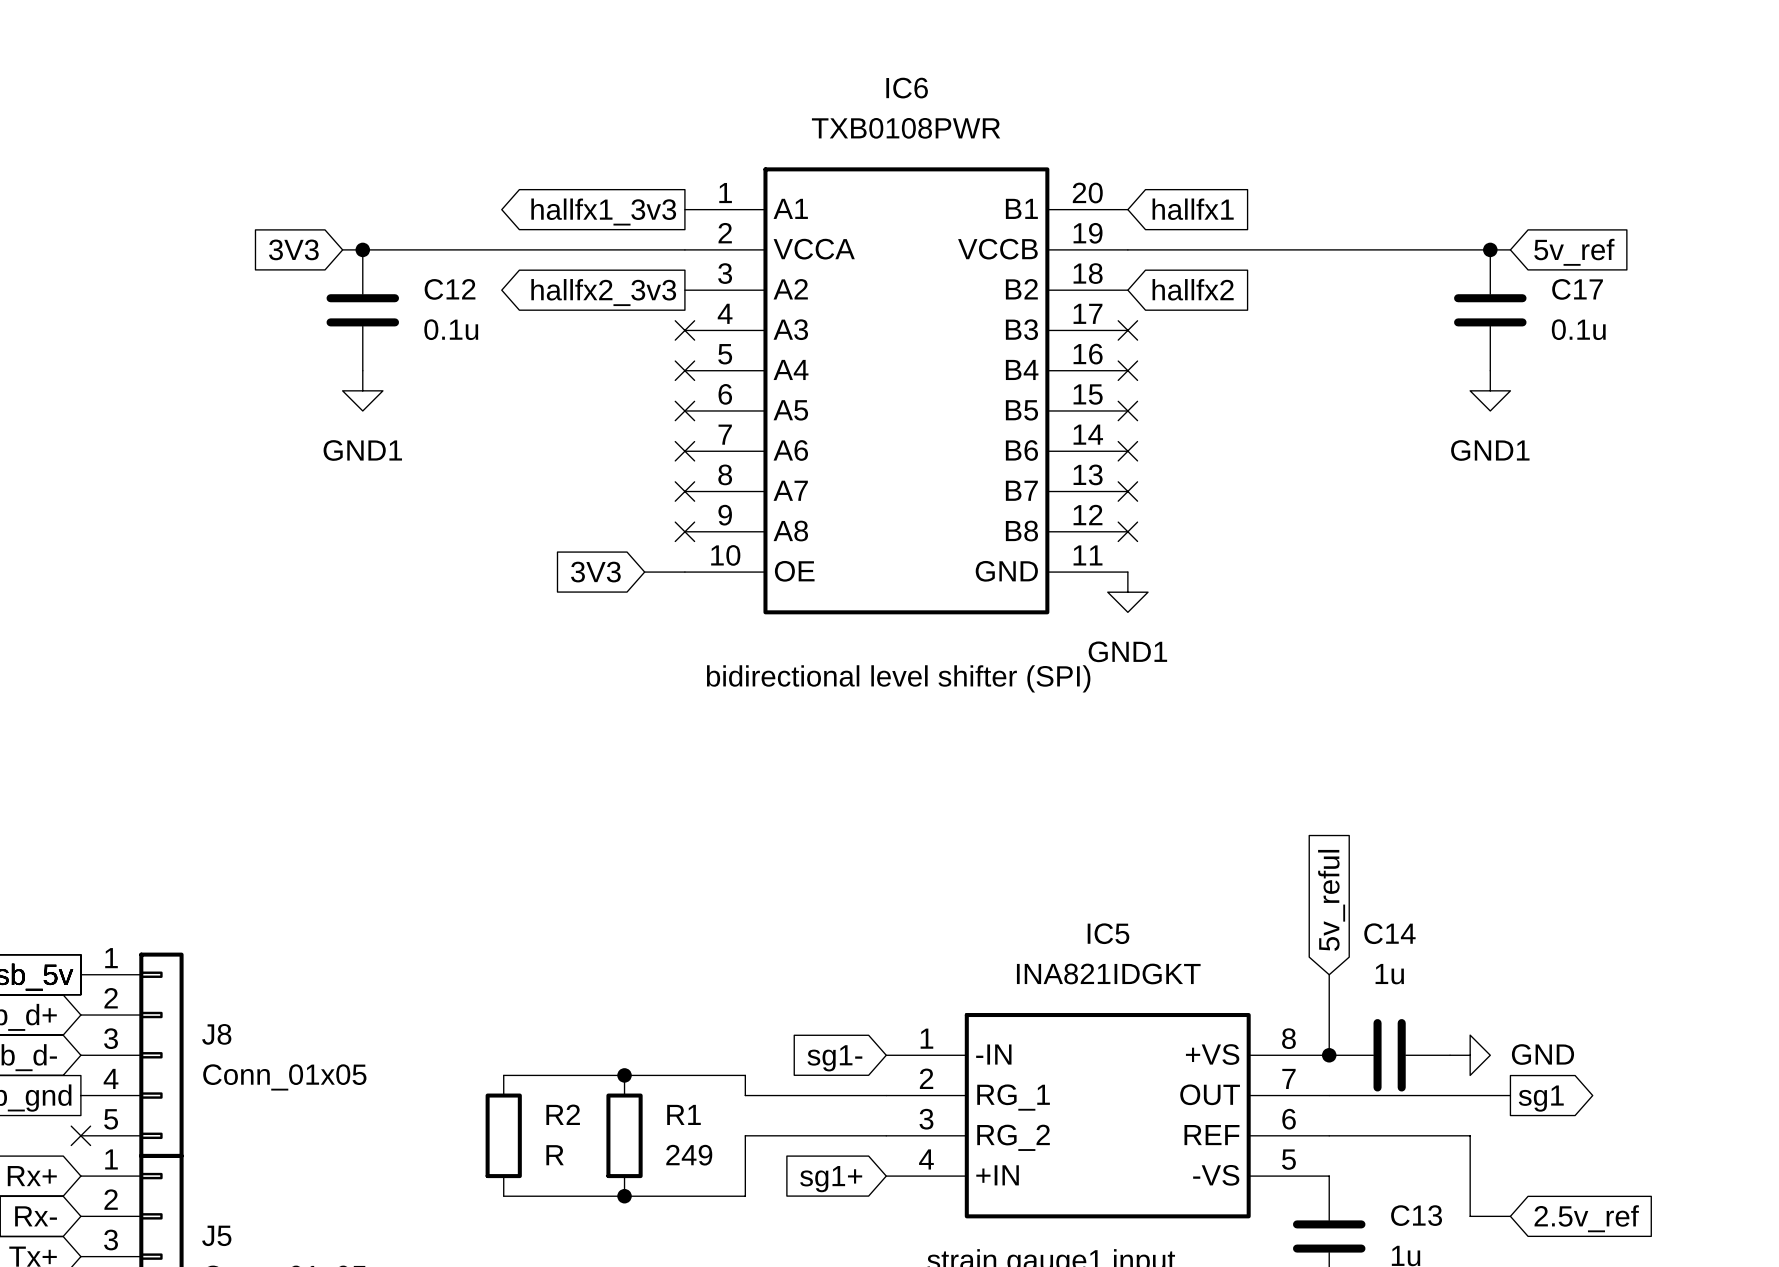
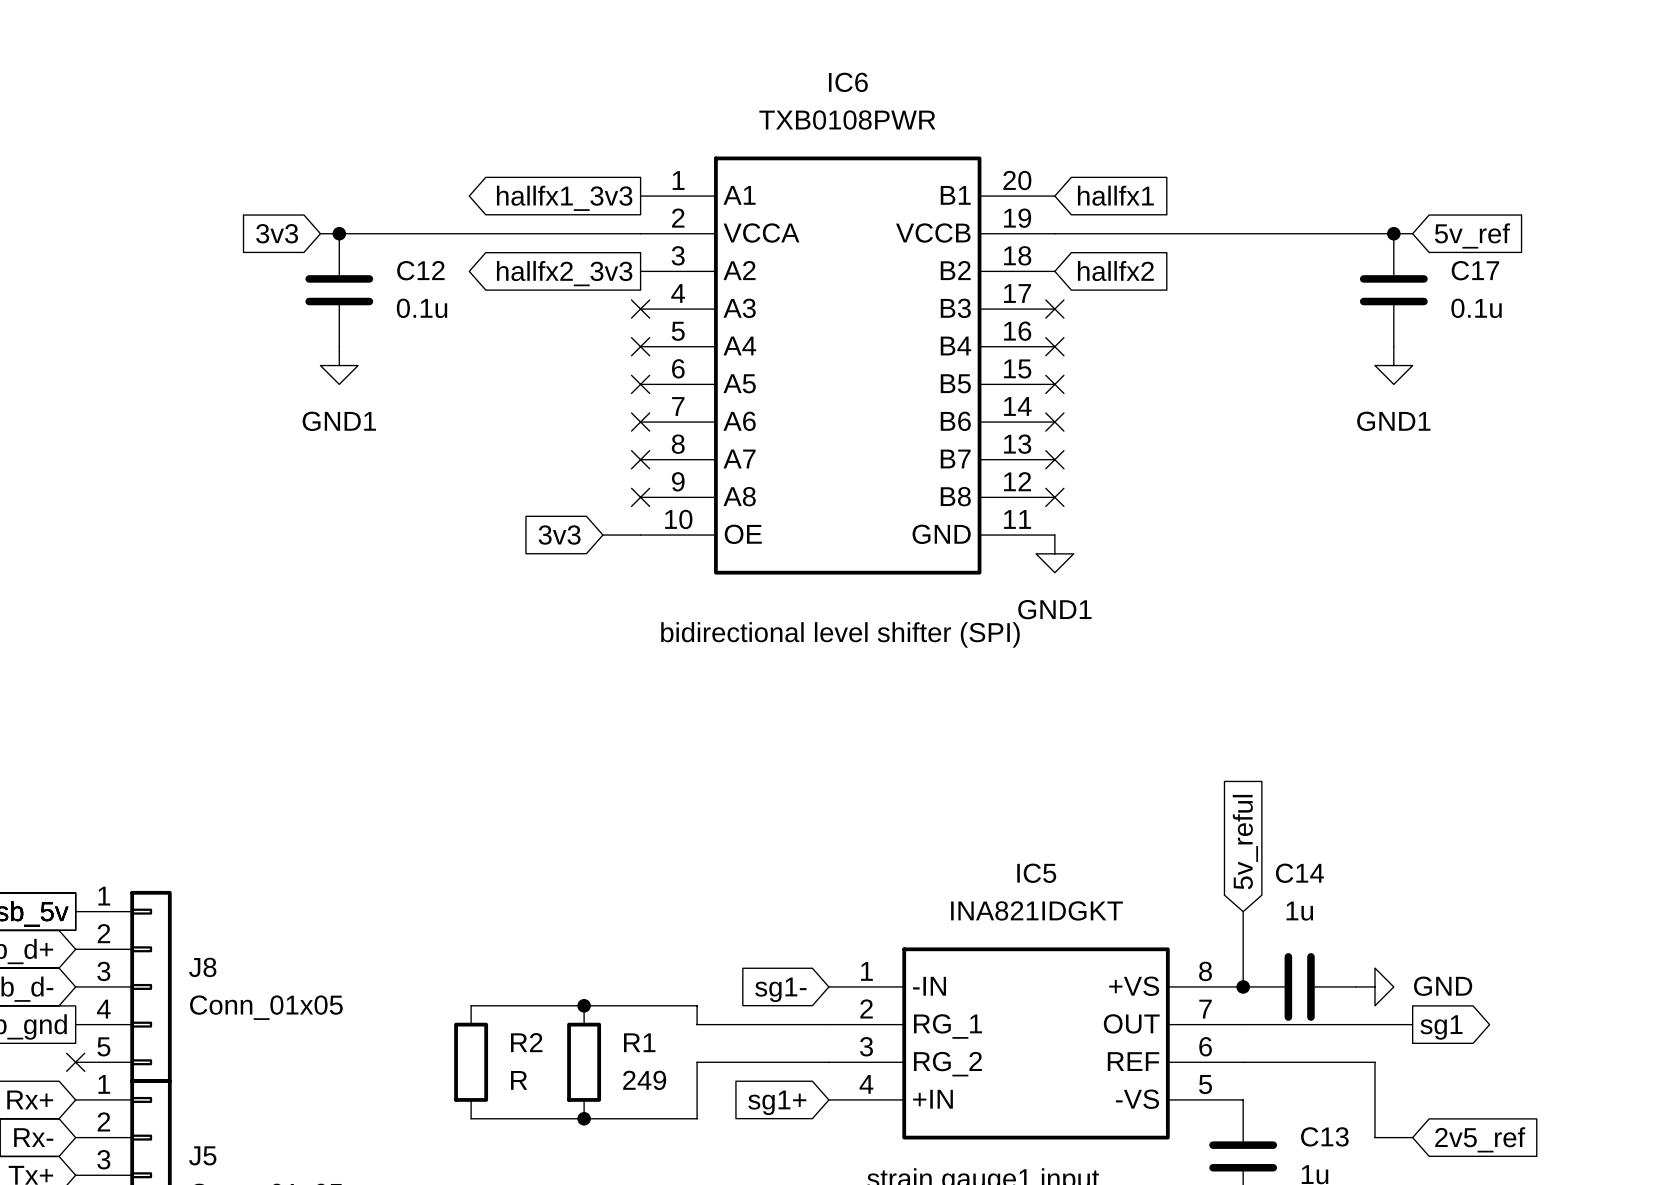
global label: 3V3 (293, 249) -> 3v3 (277, 233)
global label: 3V3 (595, 572) -> 3v3 (559, 535)
global label: 2.5v_ref (1586, 1218) -> 2v5_ref (1480, 1139)

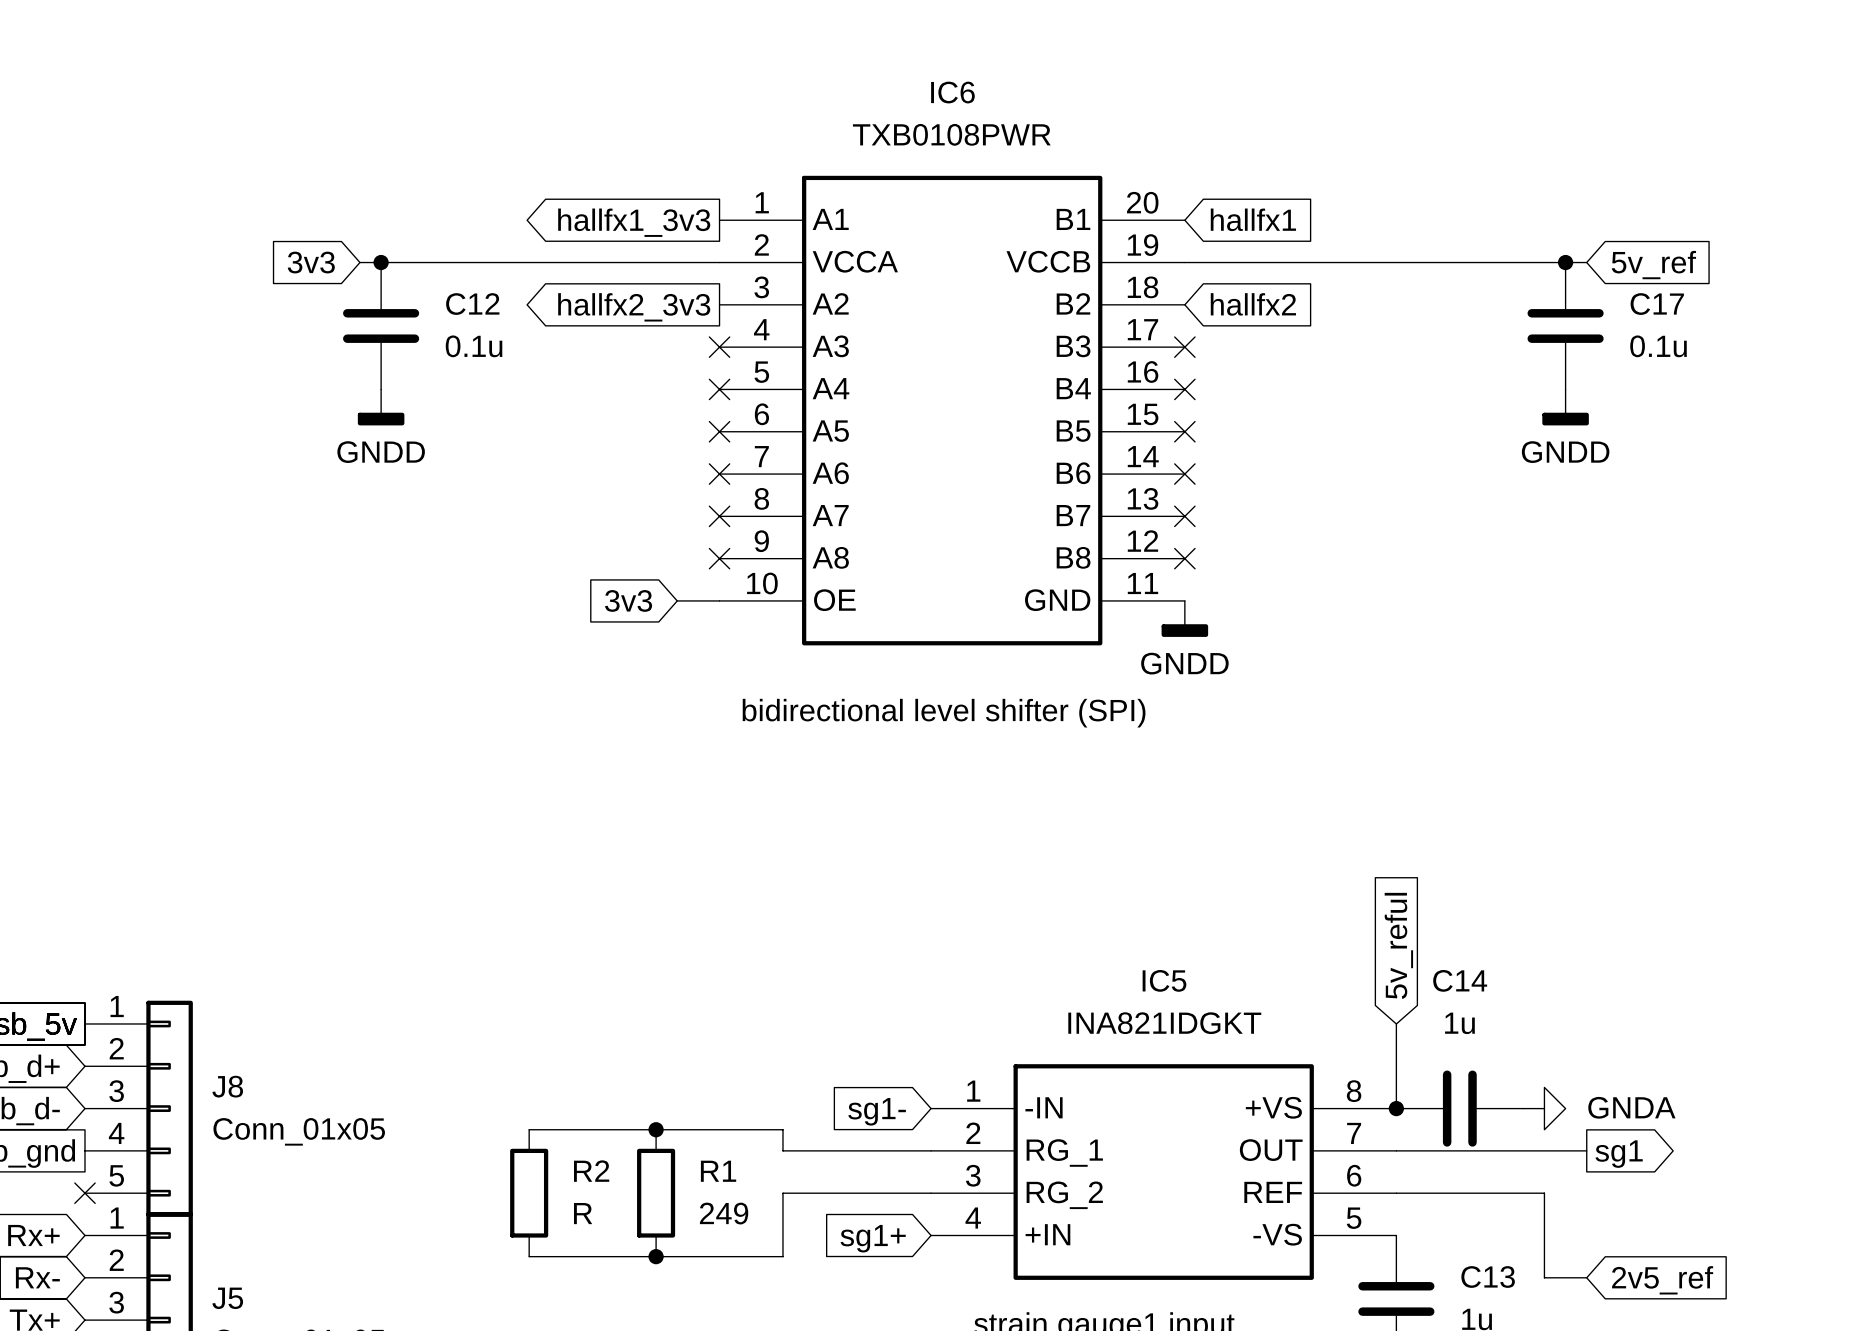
power symbol: GND1 (339, 365) -> GNDD (381, 407)
power symbol: GND1 (1393, 365) -> GNDD (1565, 407)
power symbol: GND1 (1054, 553) -> GNDD (1184, 618)
power symbol: GND (1374, 986) -> GNDA (1544, 1108)

